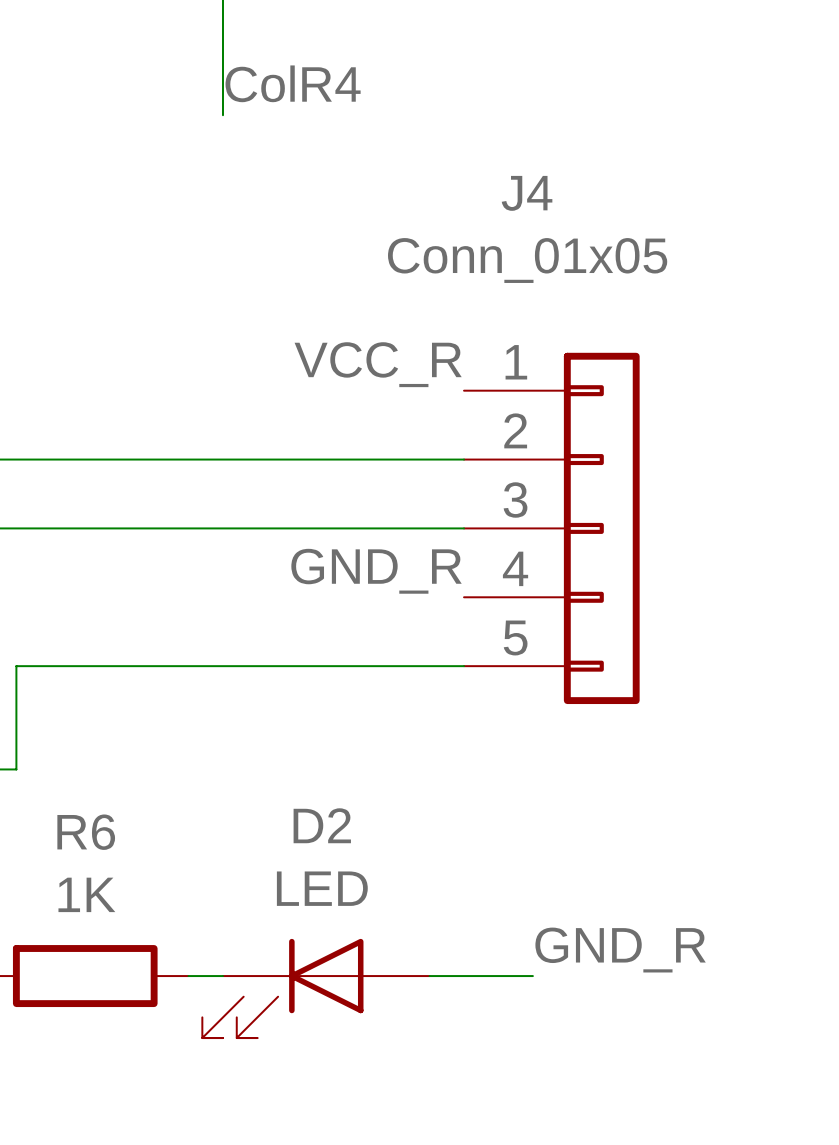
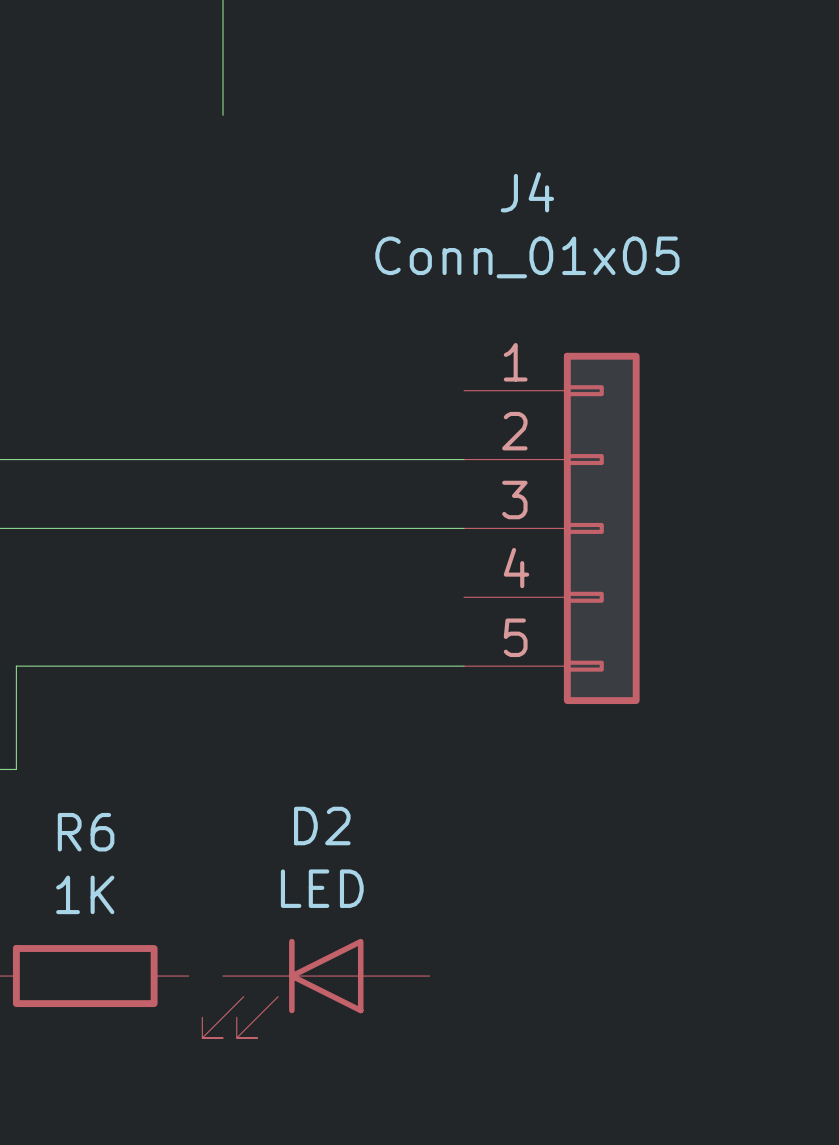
label: ColR4 (293, 83) -> none
label: VCC_R (378, 364) -> none
label: GND_R (376, 571) -> none
label: GND_R (620, 950) -> none
wire: (188, 976) (222, 976) -> none
wire: (429, 976) (532, 976) -> none

